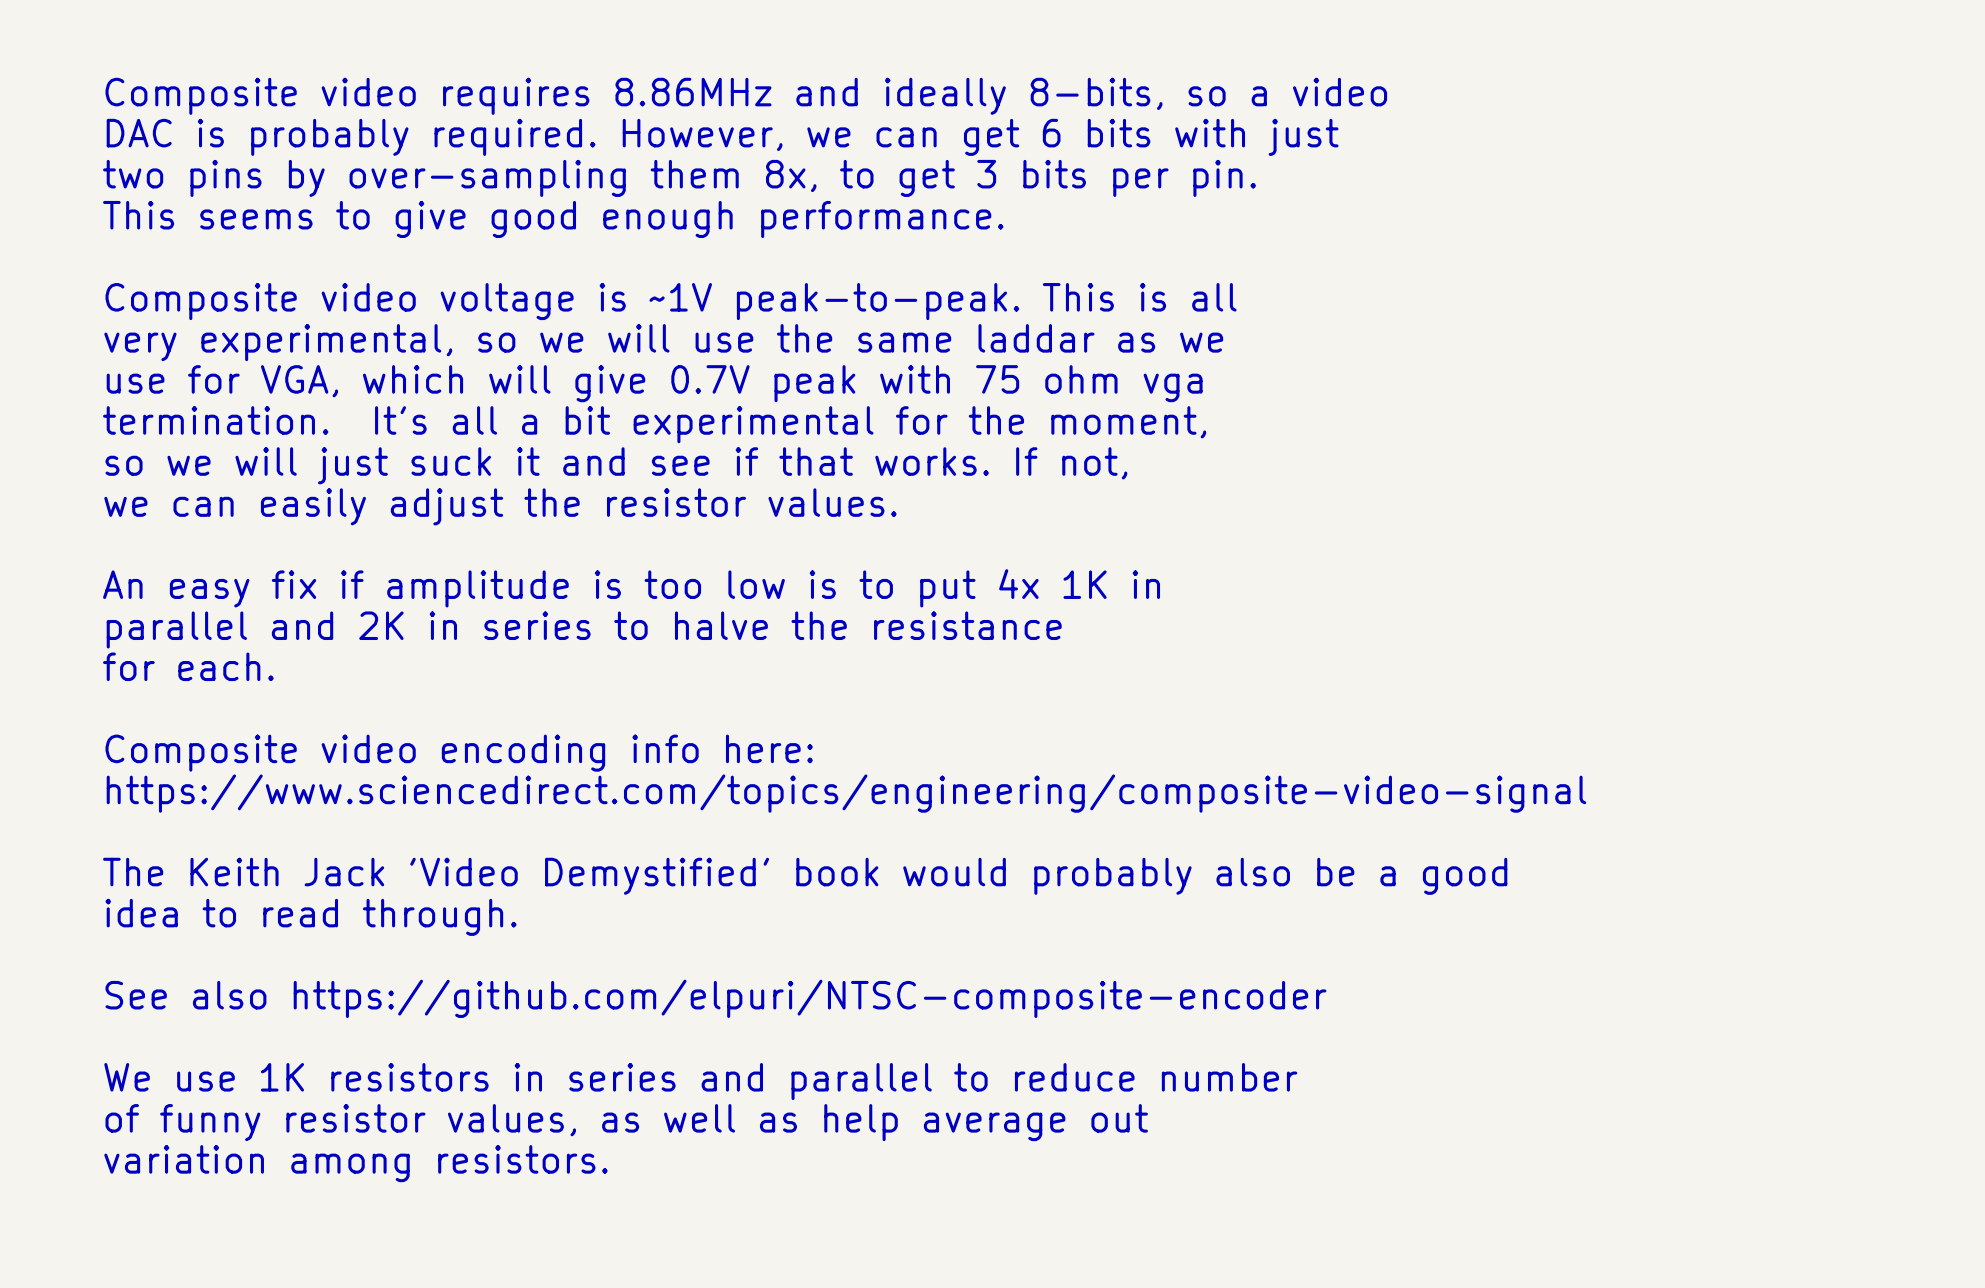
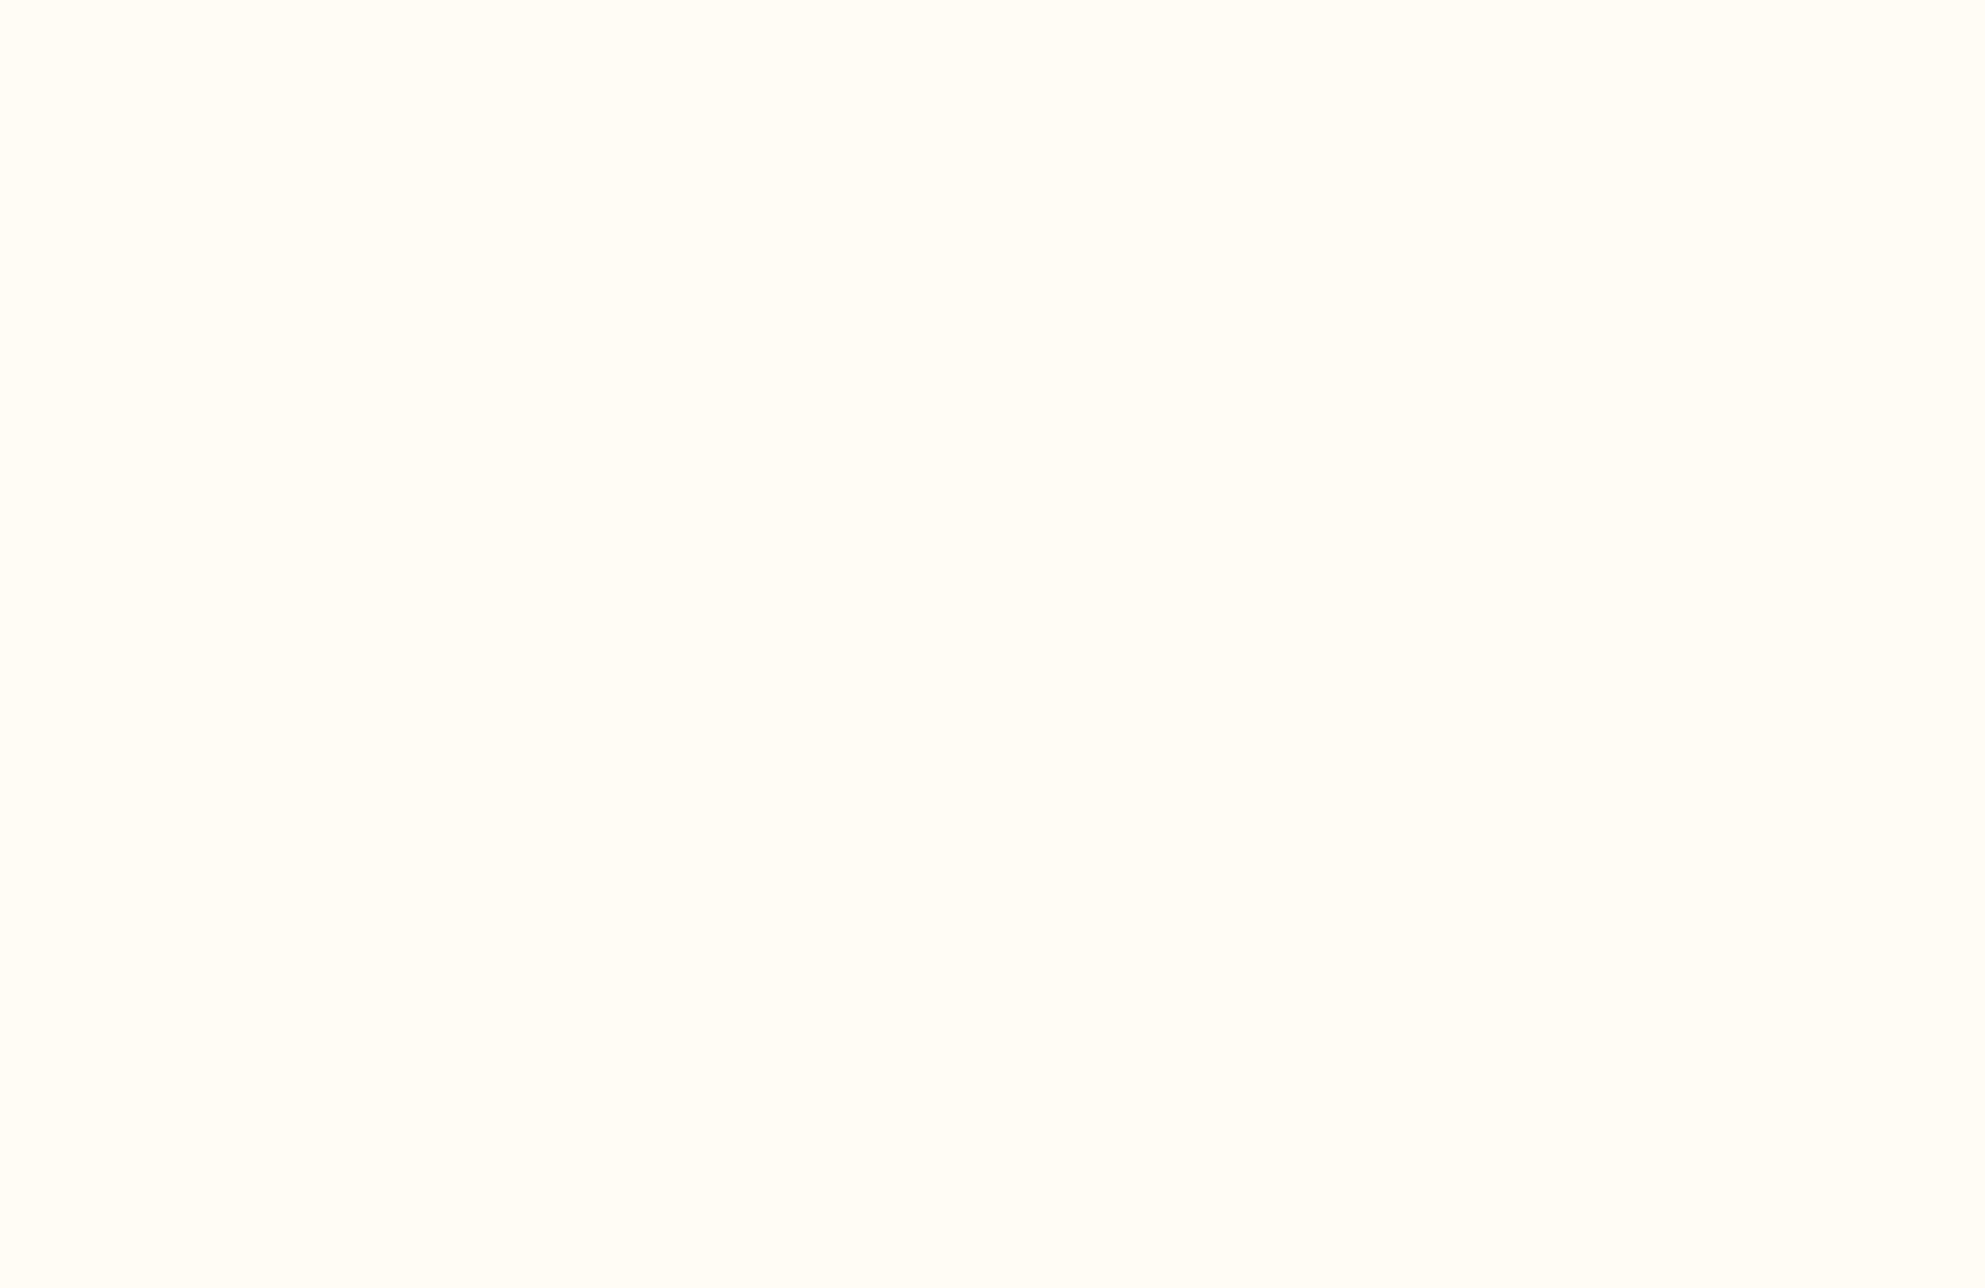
text: Composite video requires 8.86MHz and ideally 8-bits, so a video (746, 96) -> none
text: DAC is probably required. However, we can get 6 bits with just (722, 137) -> none
text: two pins by over-sampling them 8x, to get 3 bits per pin. (679, 178) -> none
text: This seems to give good enough performance. (553, 219) -> none
text: Composite video voltage is ~1V peak-to-peak. This is all (671, 301) -> none
text: very experimental, so we will use the same laddar as we (663, 342) -> none
text: use for VGA, which will give 0.7V peak with 75 ohm vga (654, 383) -> none
text: termination. It's all a bit experimental for the moment, (654, 424) -> none
text: so we will just suck it and see if that works. If not, (616, 465) -> none
text: we can easily adjust the resistor values. (500, 506) -> none
text: An easy fix if amplitude is too low is to put 4x 1K in (631, 588) -> none
text: parallel and 2K in series to halve the resistance (584, 629) -> none
text: for each. (188, 666) -> none
text: Composite video encoding info here: (459, 753) -> none
text: https://www.sciencedirect.com/topics/engineering/composite-video-signal (846, 793) -> none
text: The Keith Jack 'Video Demystified' book would probably also be a good (805, 876) -> none
text: idea to read through. (311, 917) -> none
text: See also https://github.com/elpuri/NTSC-composite-encoder (715, 998) -> none
text: We use 1K resistors in series and parallel to reduce number (700, 1081) -> none
text: of funny resistor values, as well as help average out (626, 1122) -> none
text: variation among resistors. (355, 1163) -> none

